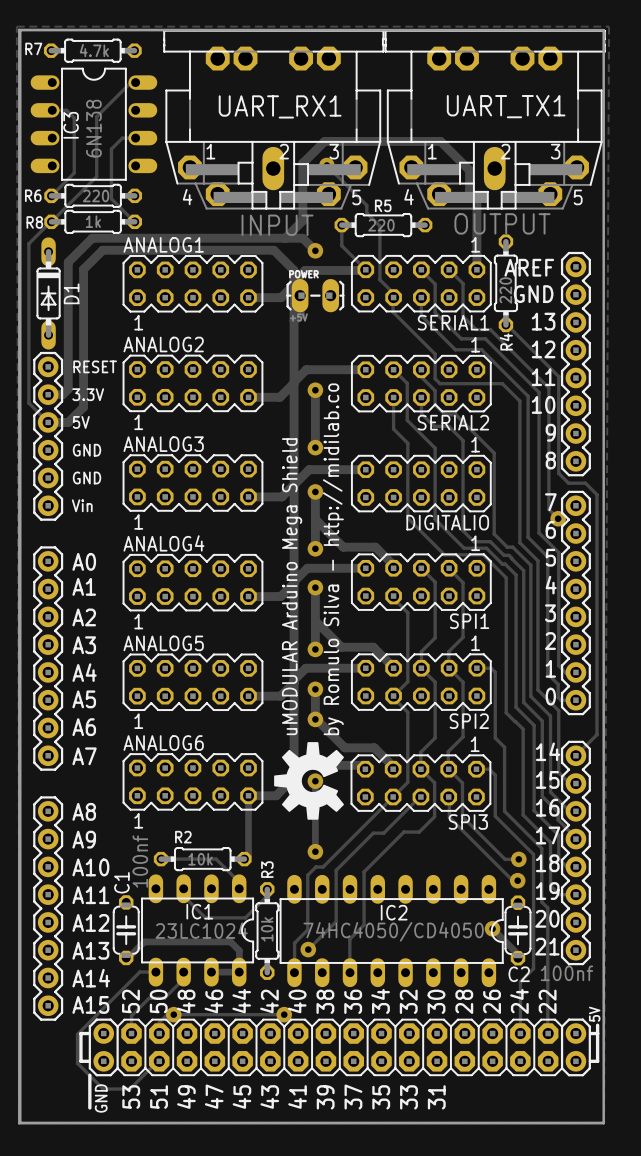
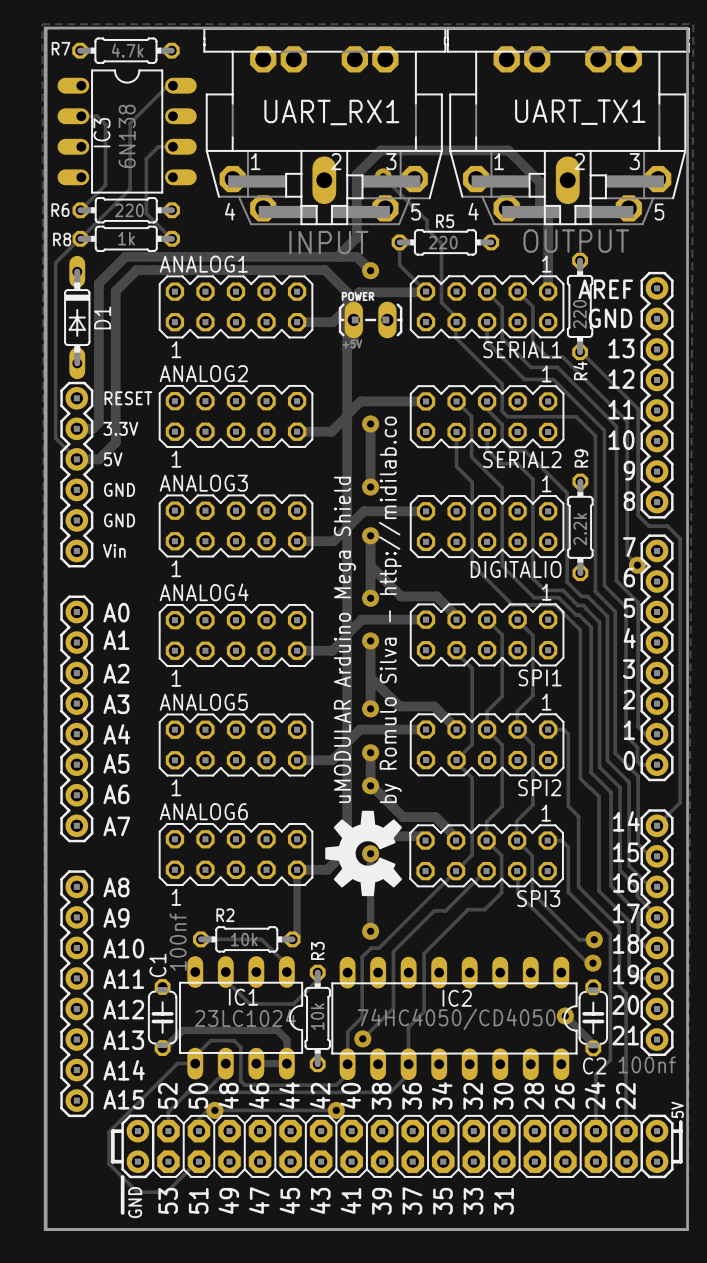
R9: none -> 2.2k (580, 527)
track: none -> (195, 1063) (195, 1056) (210, 1040) (234, 1040) (240, 1047) (240, 1080) (244, 1085) (336, 1085) (347, 1073)
track: none -> (408, 1074) (390, 1092) (204, 1092)

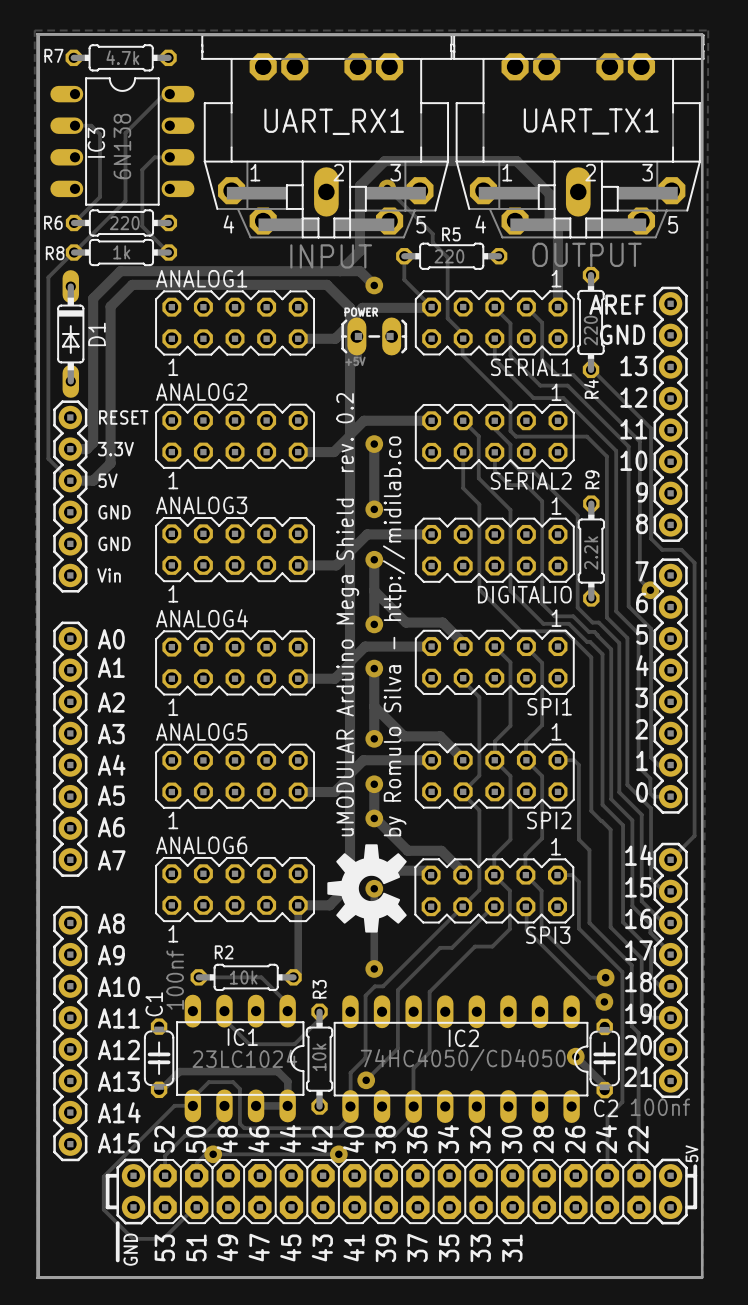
text: uMODULAR Arduino Mega Shield (344, 639) -> uMODULAR Arduino Mega Shield rev. 0.2 (347, 614)

